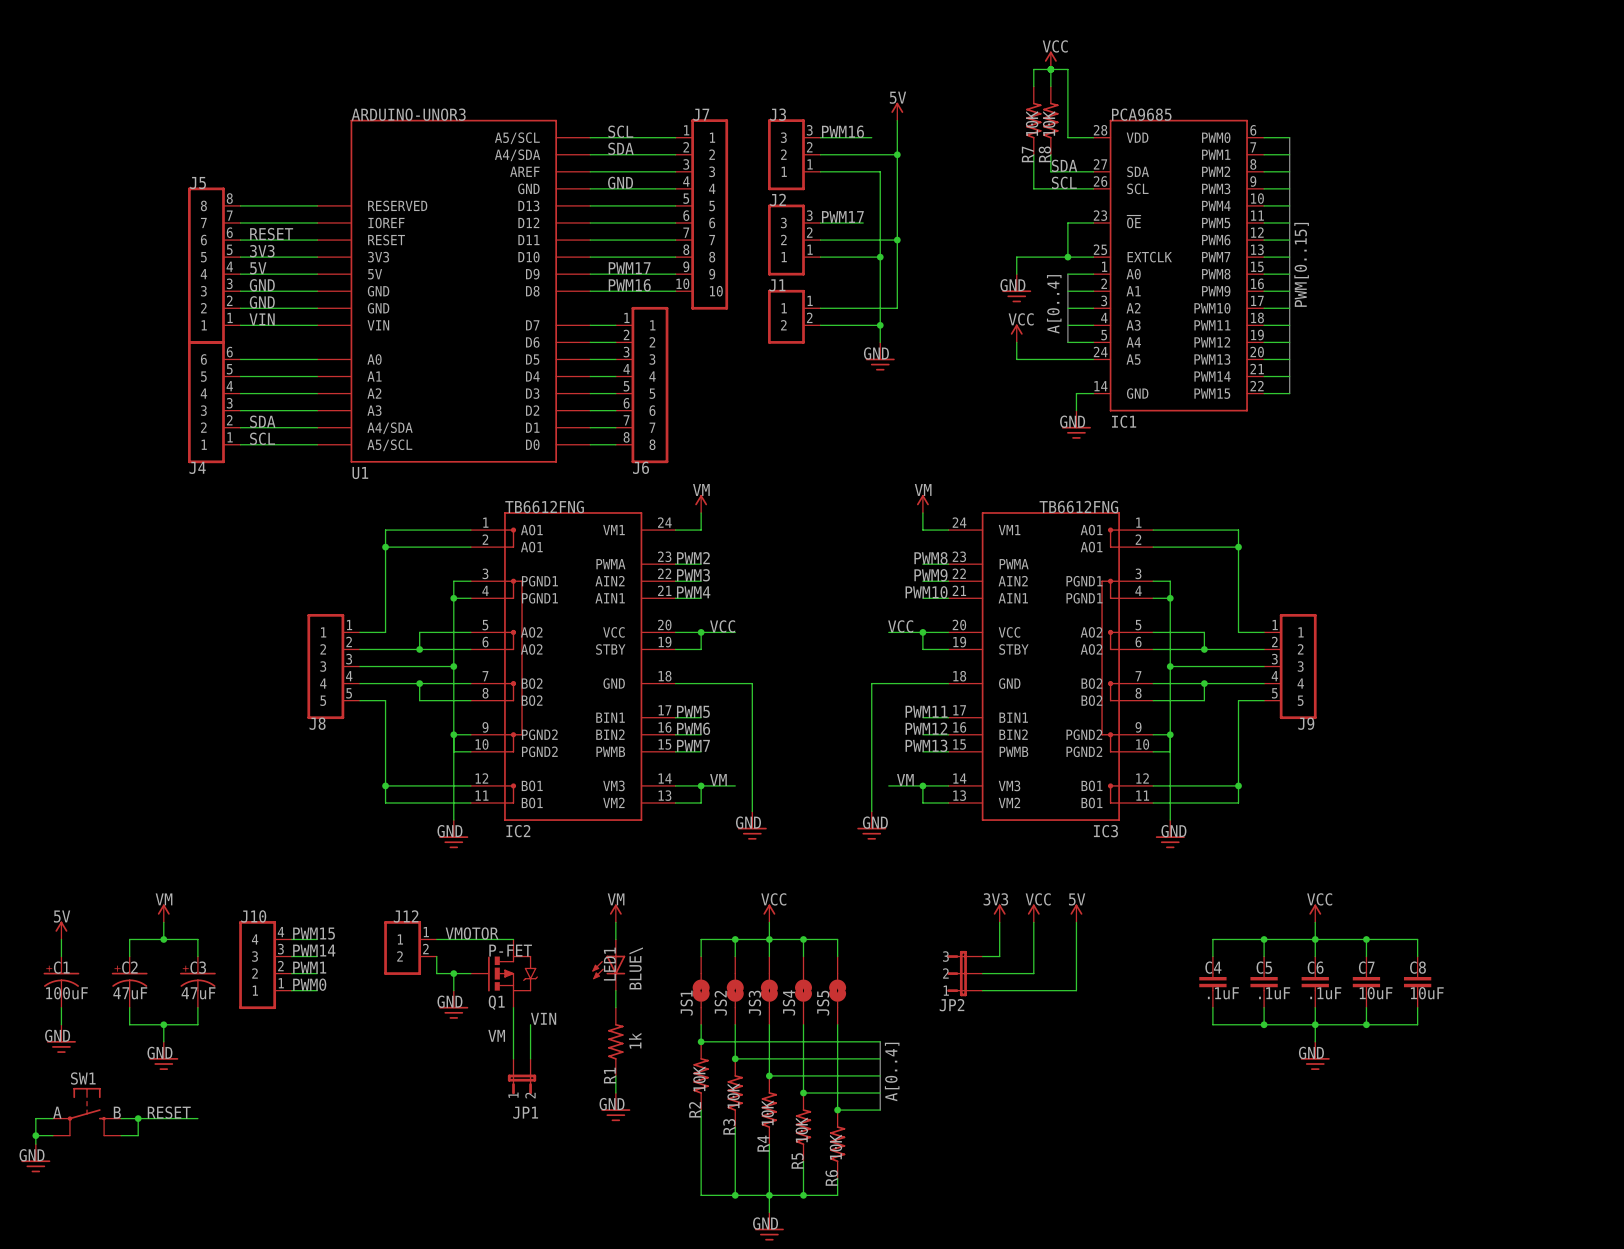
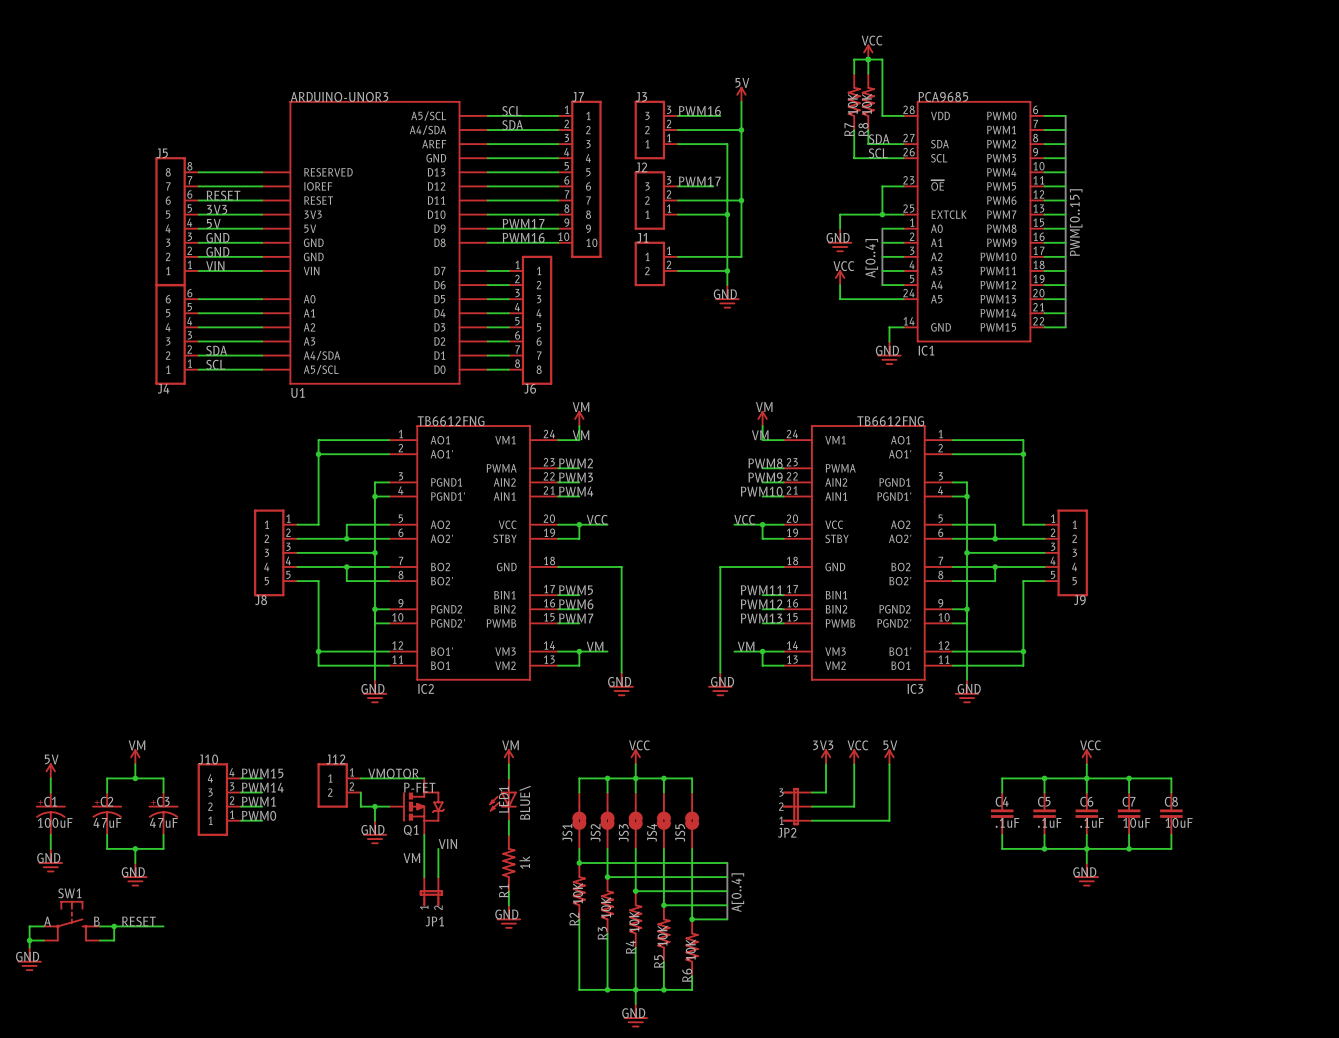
label: GND (620, 182) -> none
IC2 symbol: [470, 512, 676, 821] -> [389, 425, 559, 681]
IC3 symbol: [948, 512, 1154, 821] -> [783, 425, 953, 681]
label: none -> VM (581, 435)
label: none -> VM (760, 435)

